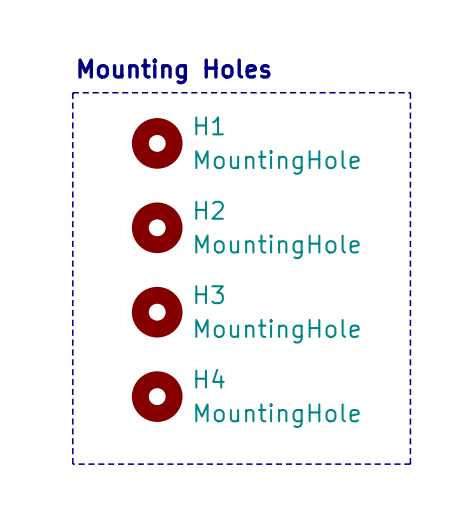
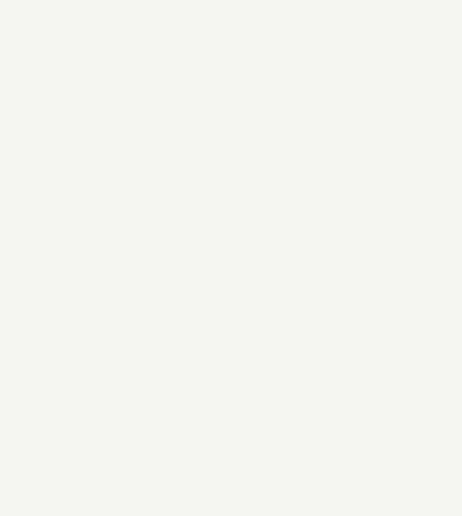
text: Mounting Holes (174, 71) -> none
line: (72, 92) (410, 92) (410, 464) (72, 464) (72, 92) -> none
H1: MountingHole (157, 143) -> none
H2: MountingHole (157, 227) -> none
H3: MountingHole (157, 312) -> none
H4: MountingHole (157, 396) -> none

